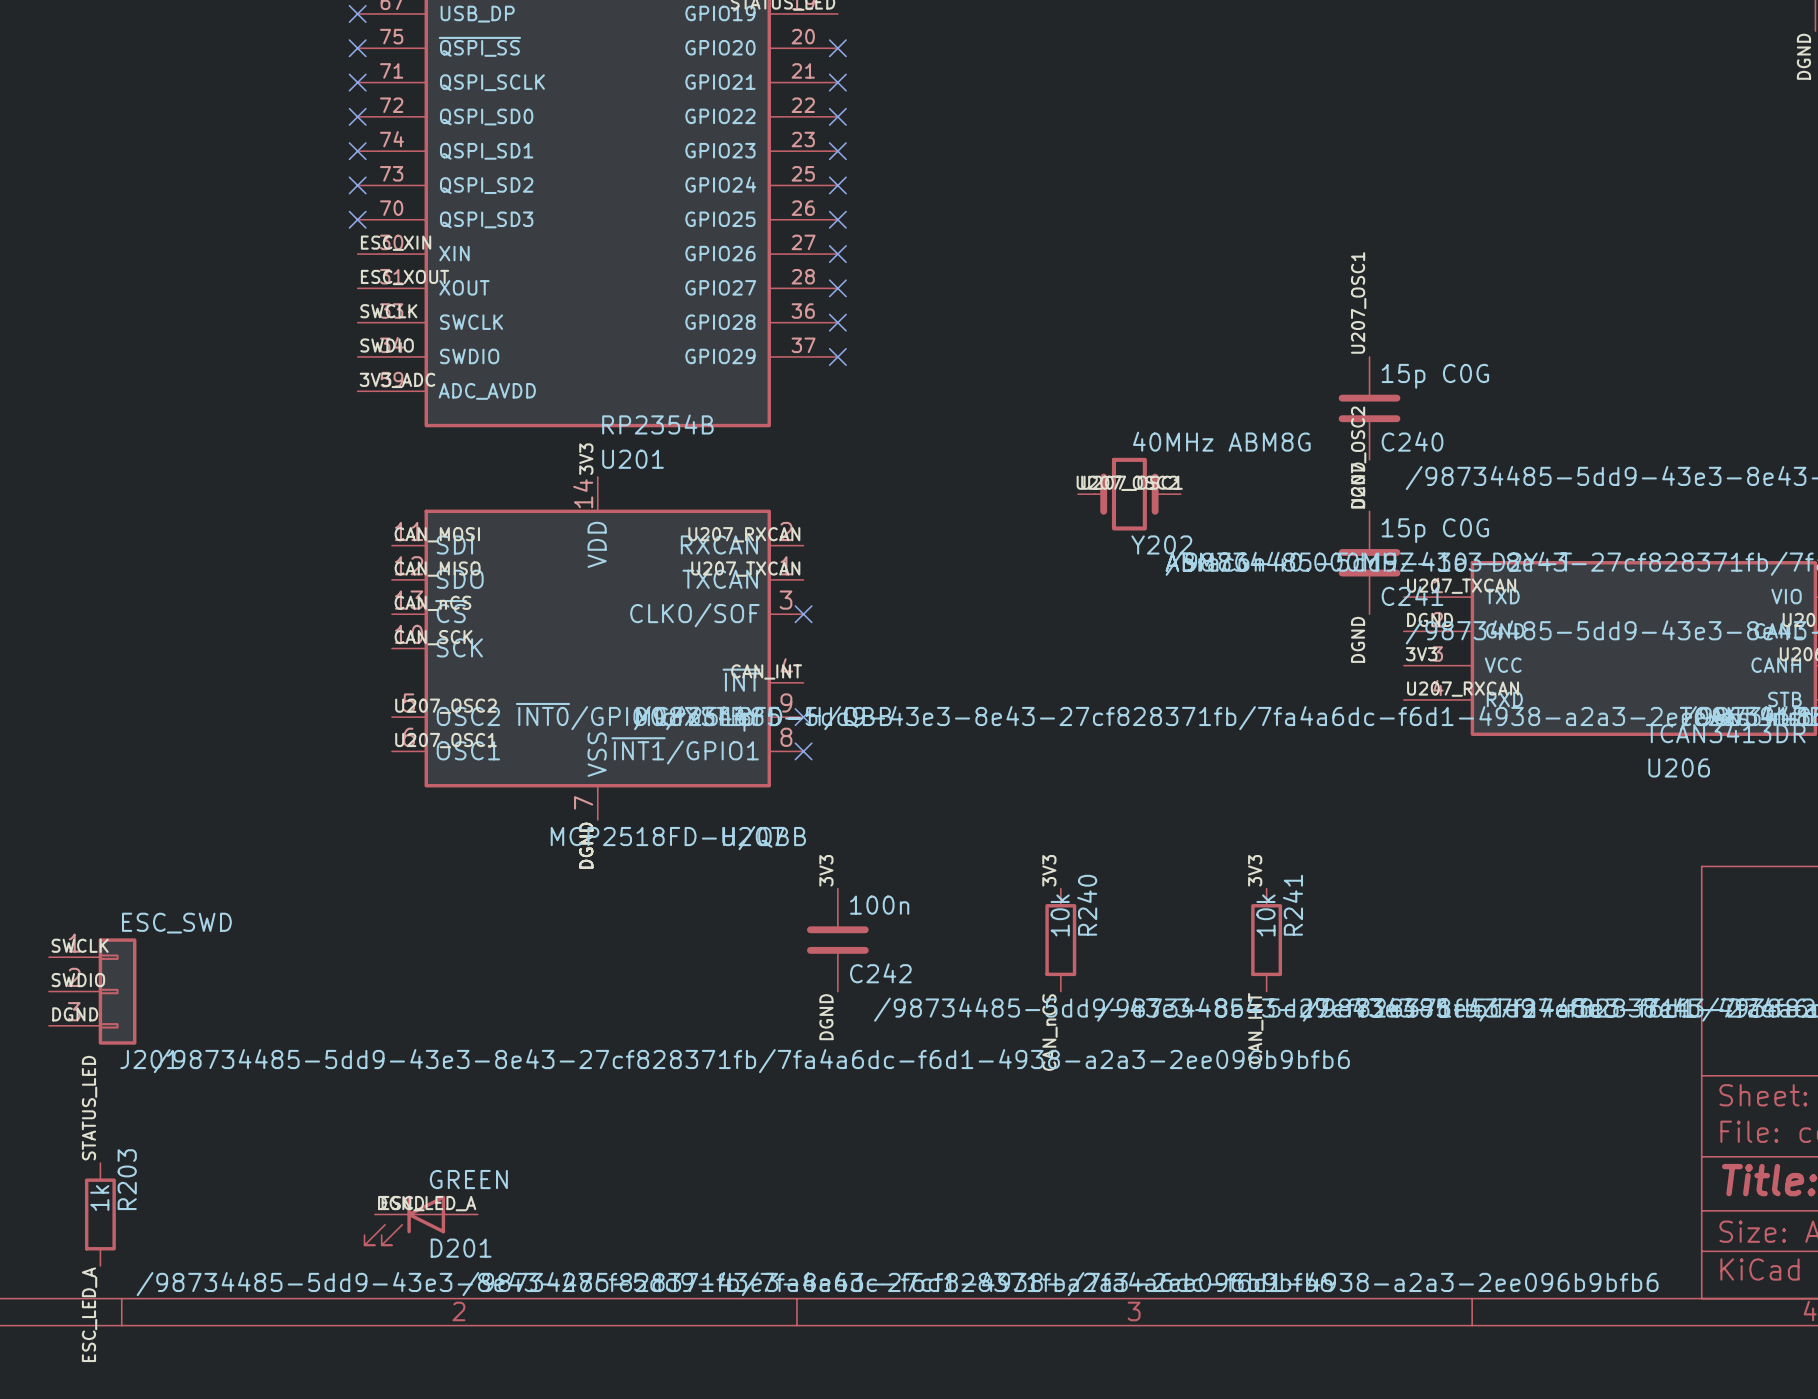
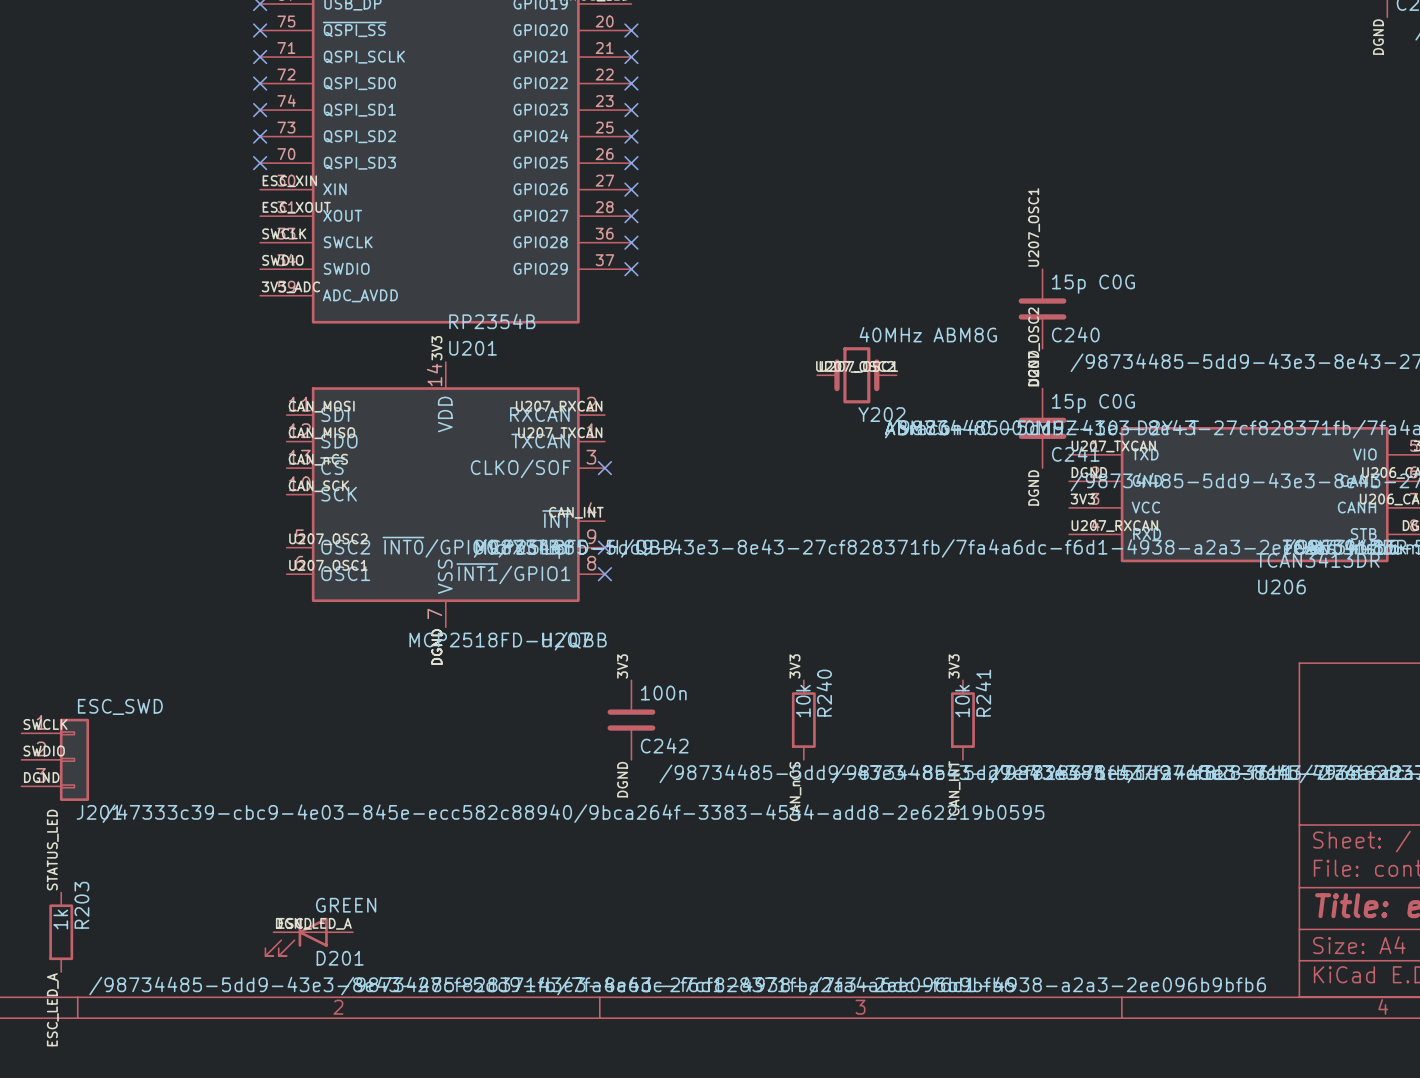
J201 text: /98734485-5dd9-43e3-8e43-27cf828371fb/7fa4a6dc-f6d1-4938-a2a3-2ee096b9bfb6 (751, 1061) -> /47333c39-cbc9-4e03-845e-ecc582c88940/9bca264f-3383-4544-add8-2e62219b0595 (573, 813)

